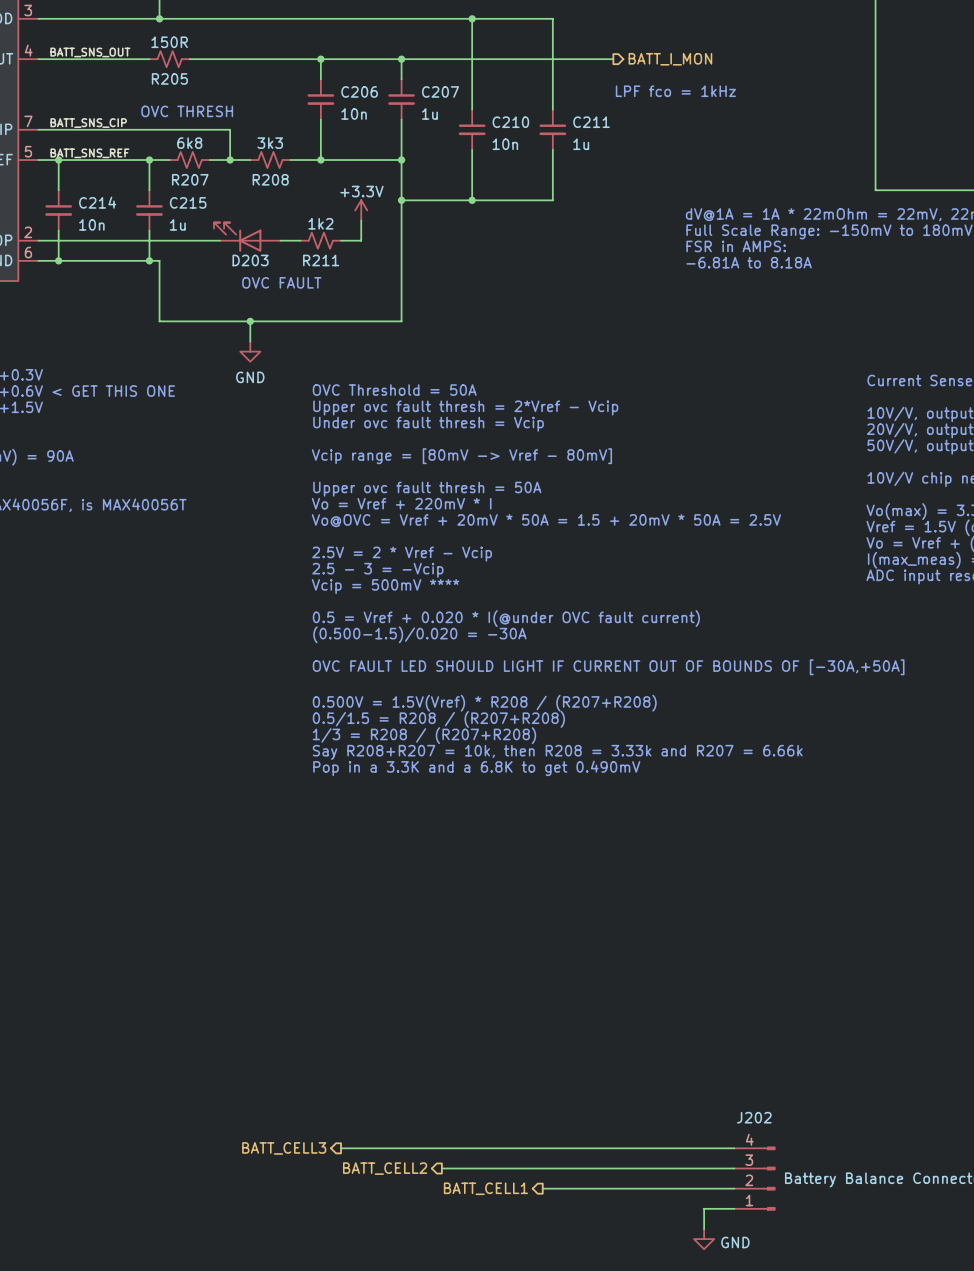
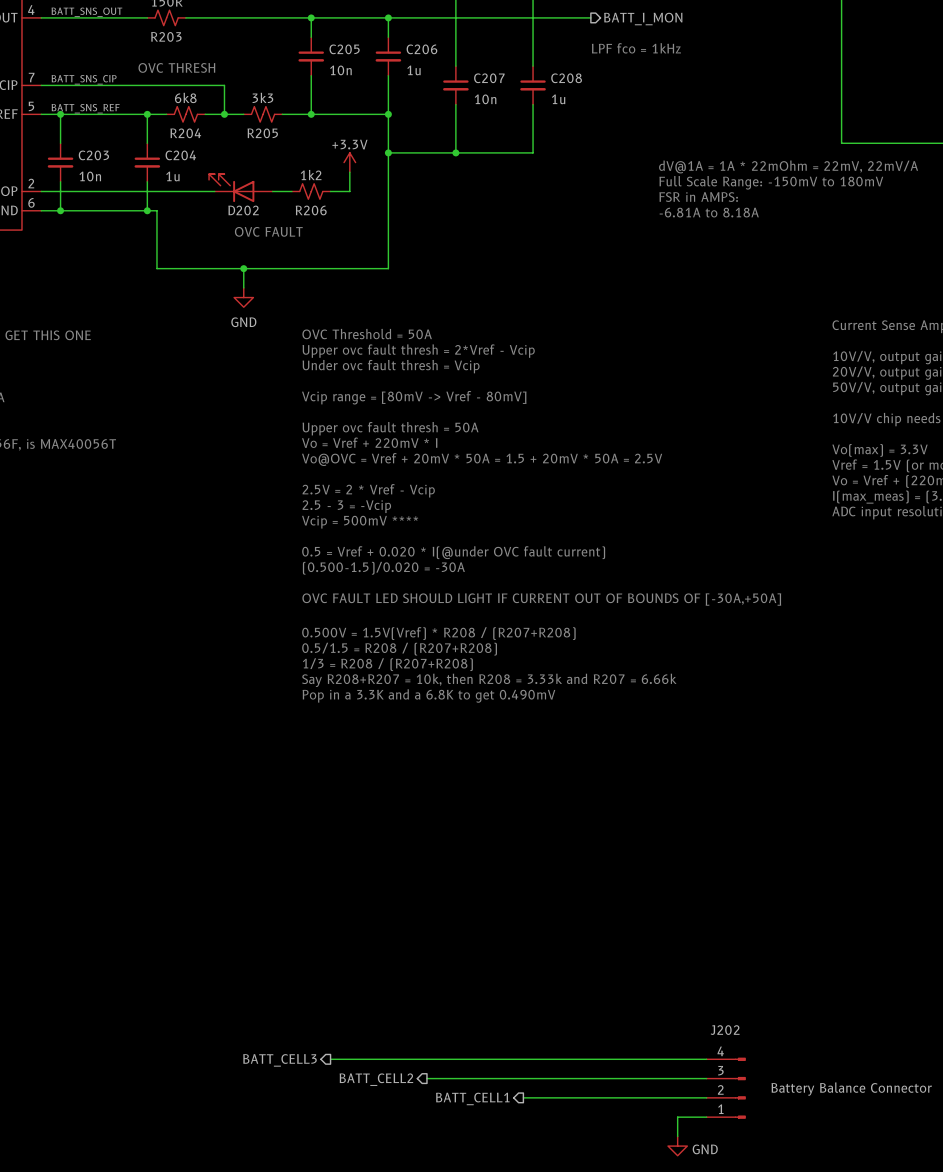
R205 name: R205 (169, 78) -> R203 (166, 36)
C206 name: C206 (359, 91) -> C205 (344, 49)
C207 name: C207 (440, 91) -> C206 (421, 49)
C210 name: C210 (510, 122) -> C207 (489, 78)
C211 name: C211 (591, 122) -> C208 (566, 78)
R207 name: R207 (190, 179) -> R204 (185, 133)
R208 name: R208 (270, 179) -> R205 (262, 133)
C214 name: C214 (97, 202) -> C203 (93, 155)
C215 name: C215 (188, 202) -> C204 (180, 155)
D203 name: D203 (250, 260) -> D202 (243, 210)
R211 name: R211 (321, 260) -> R206 (311, 210)

